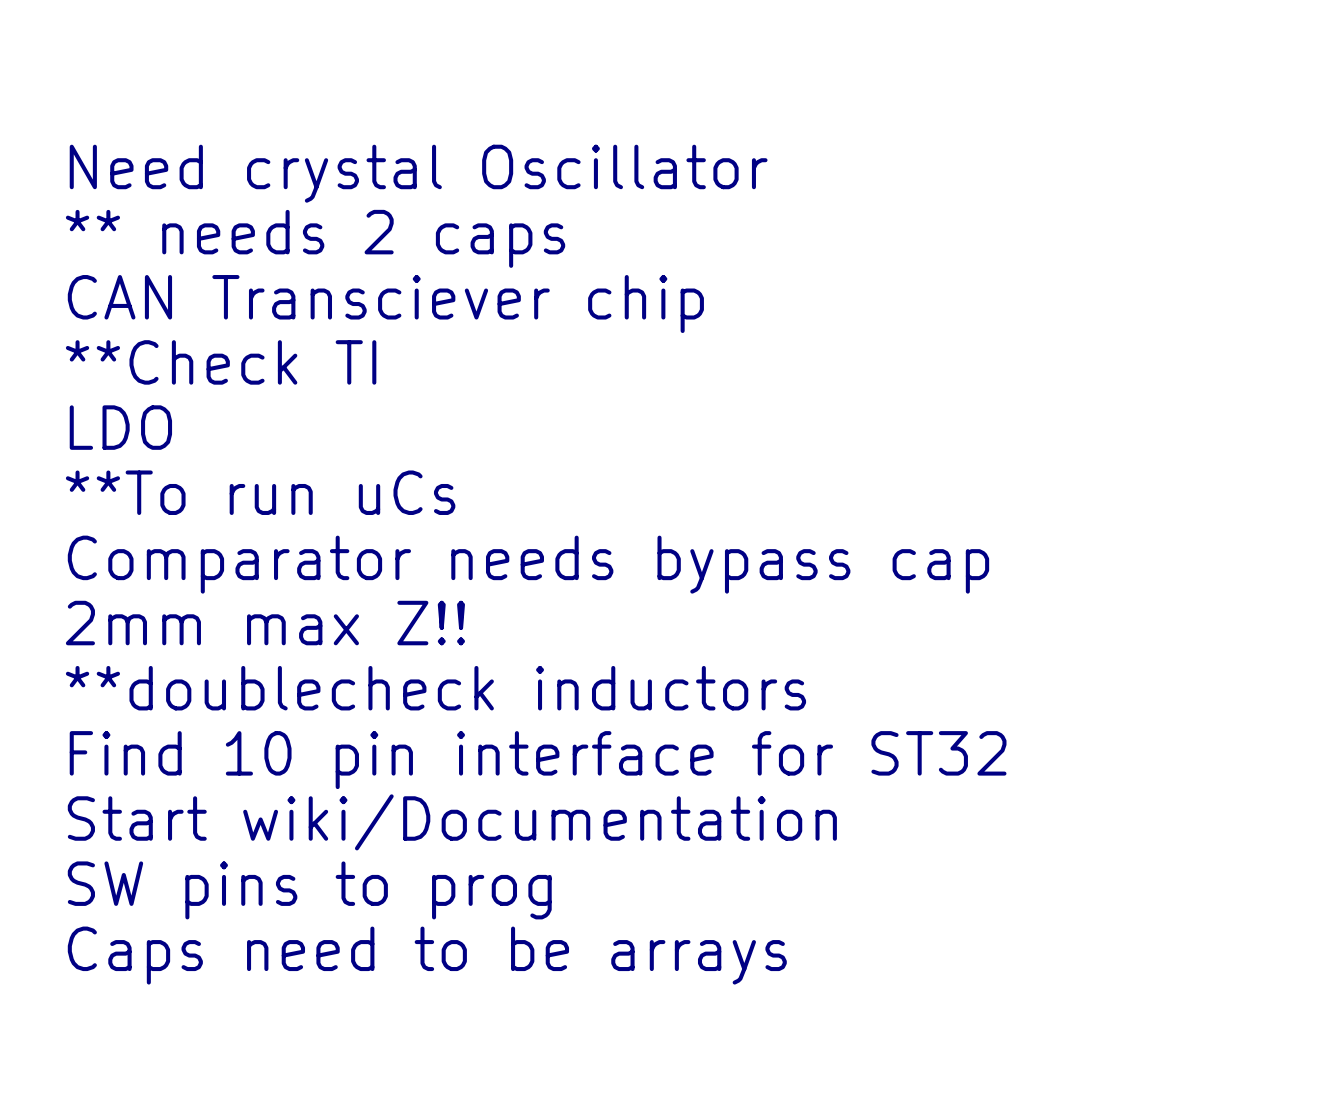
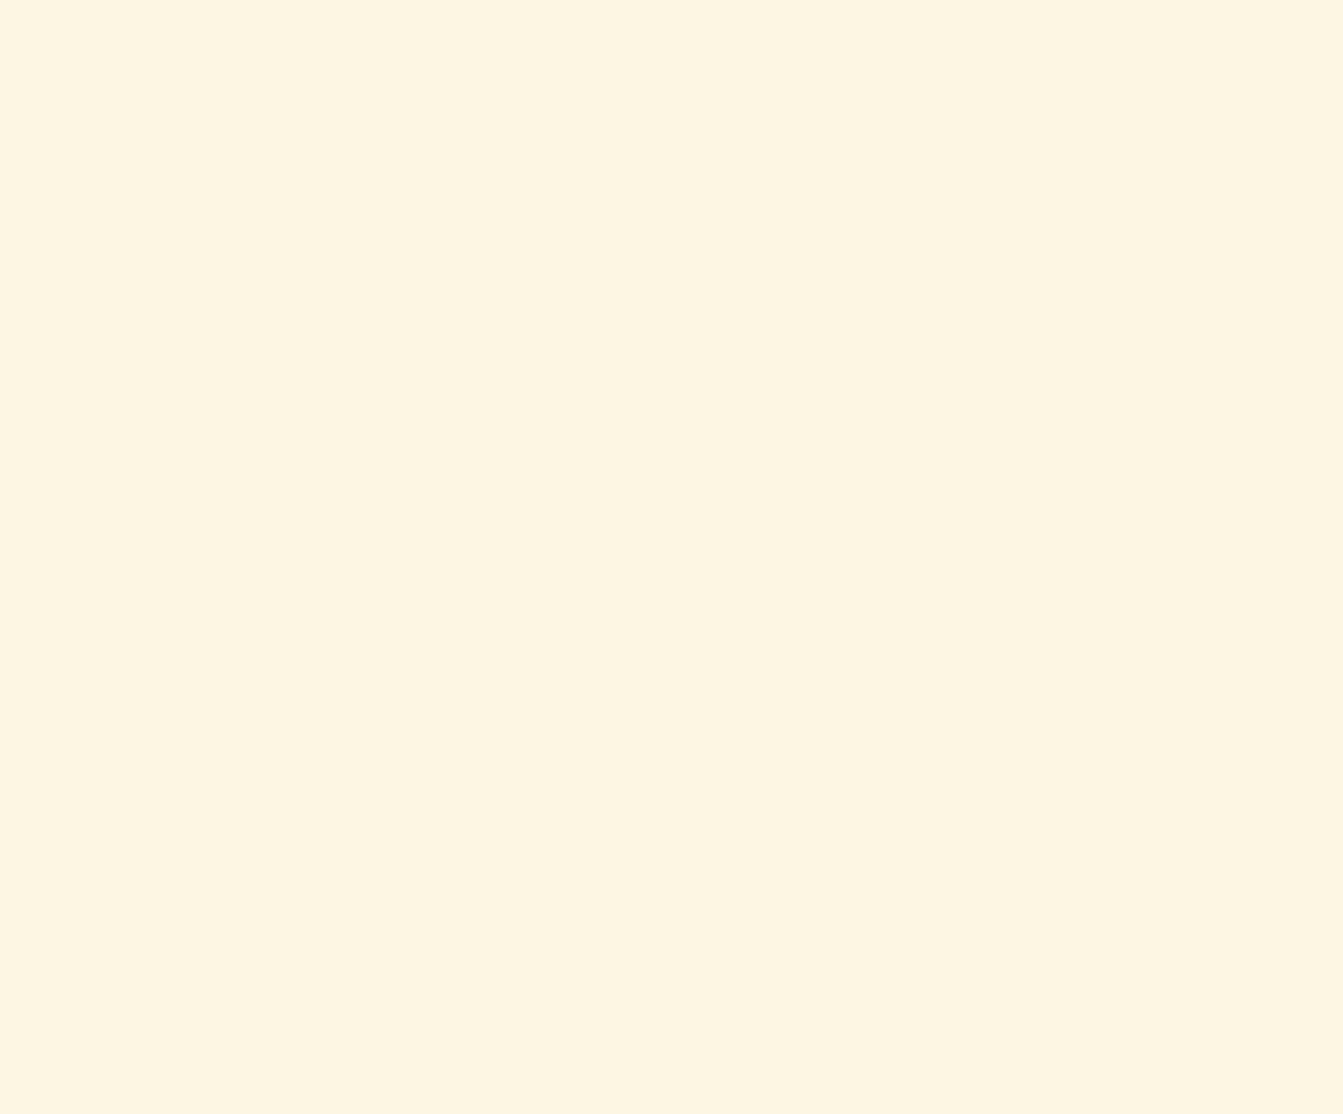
text: Need crystal Oscillator (418, 173) -> none
text: ** needs 2 caps (315, 238) -> none
text: CAN Transciever chip (385, 304) -> none
text: **Check TI (221, 362) -> none
text: LDO (120, 427) -> none
text: **To run uCs (260, 492) -> none
text: Comparator needs bypass cap (528, 564) -> none
text: 2mm max Z!! (265, 623) -> none
text: **doublecheck inductors (435, 688) -> none
text: Find 10 pin interface for ST32 (538, 760) -> none
text: Start wiki/Documentation (452, 822) -> none
text: SW pins to prog (309, 890) -> none
text: Caps need to be arrays (427, 955) -> none

